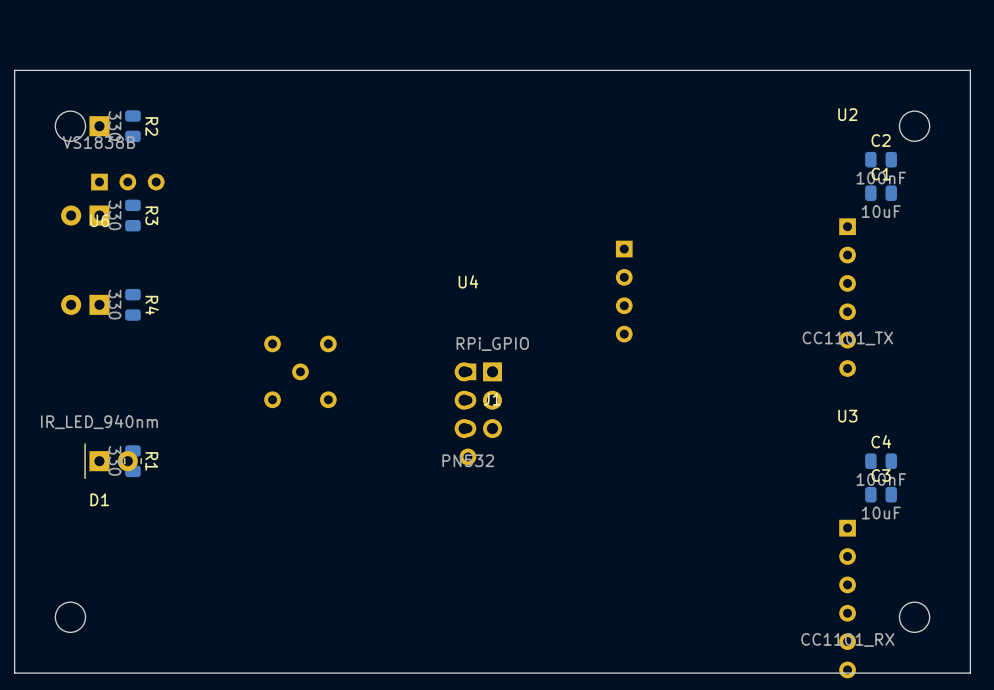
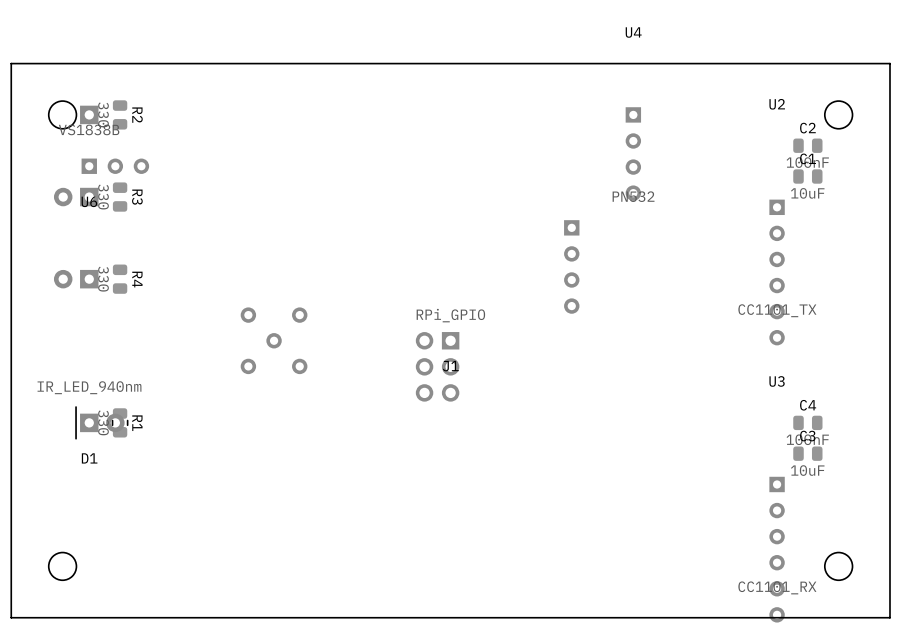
U4 position: (467, 414) -> (633, 154)

